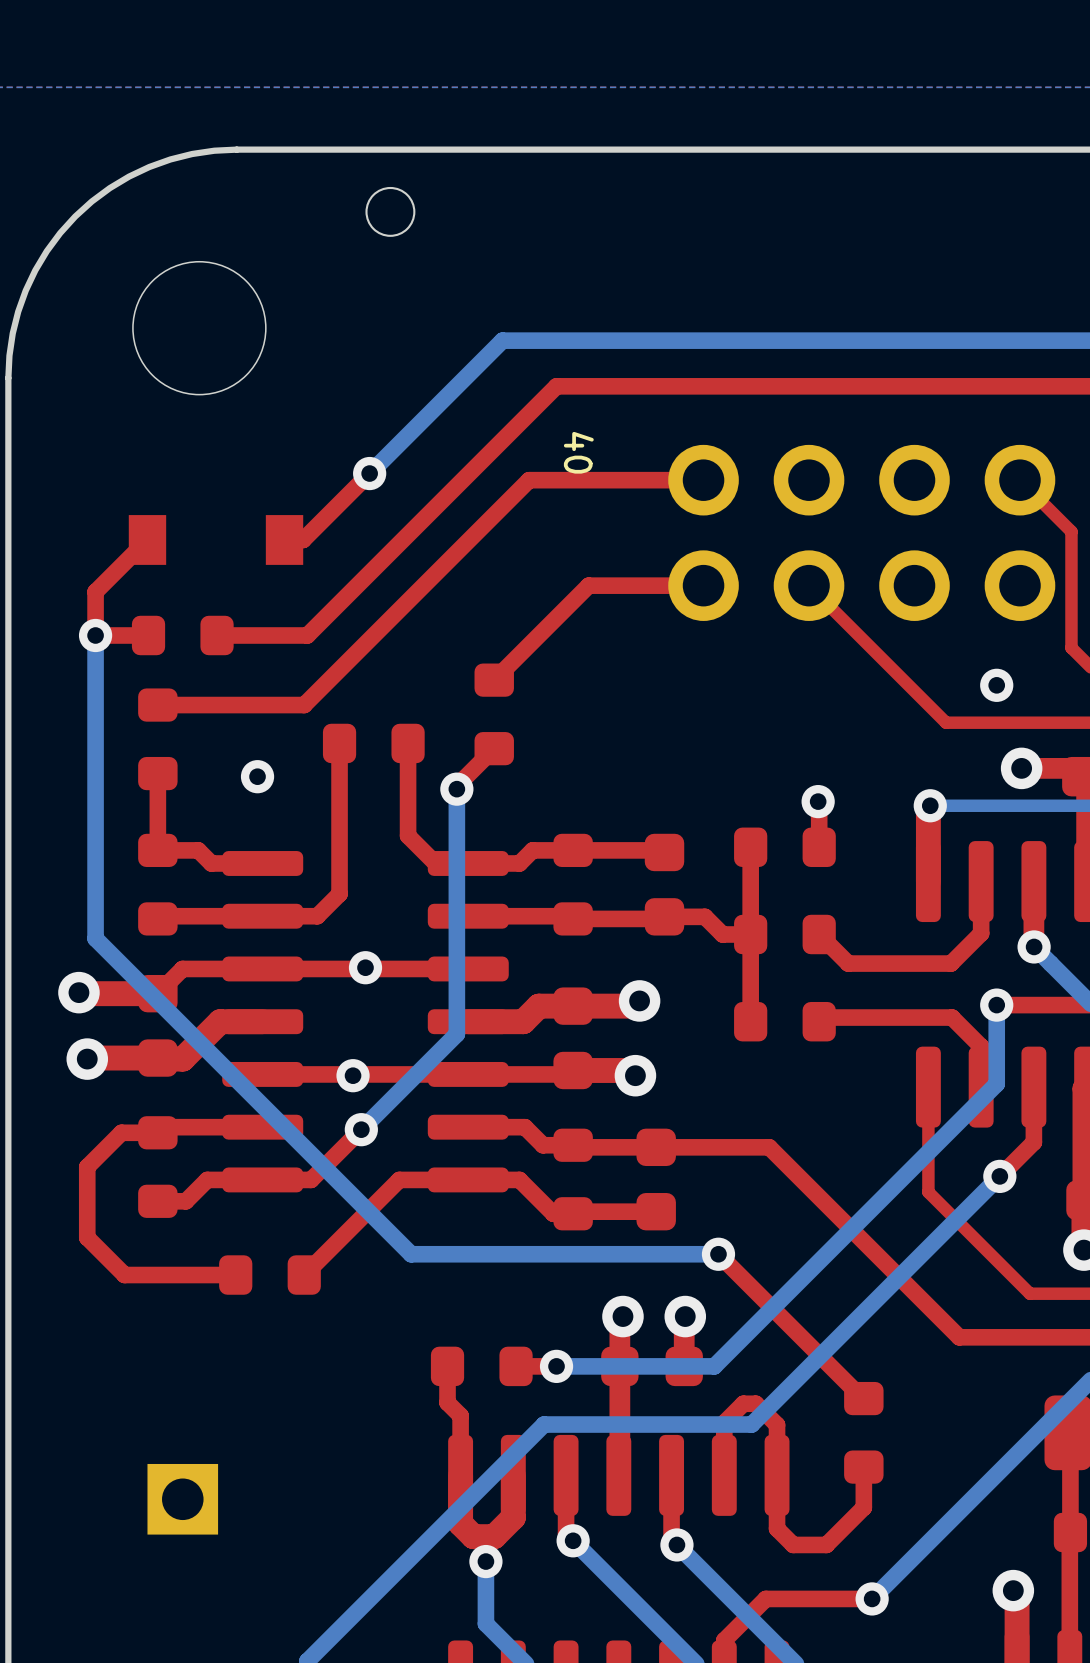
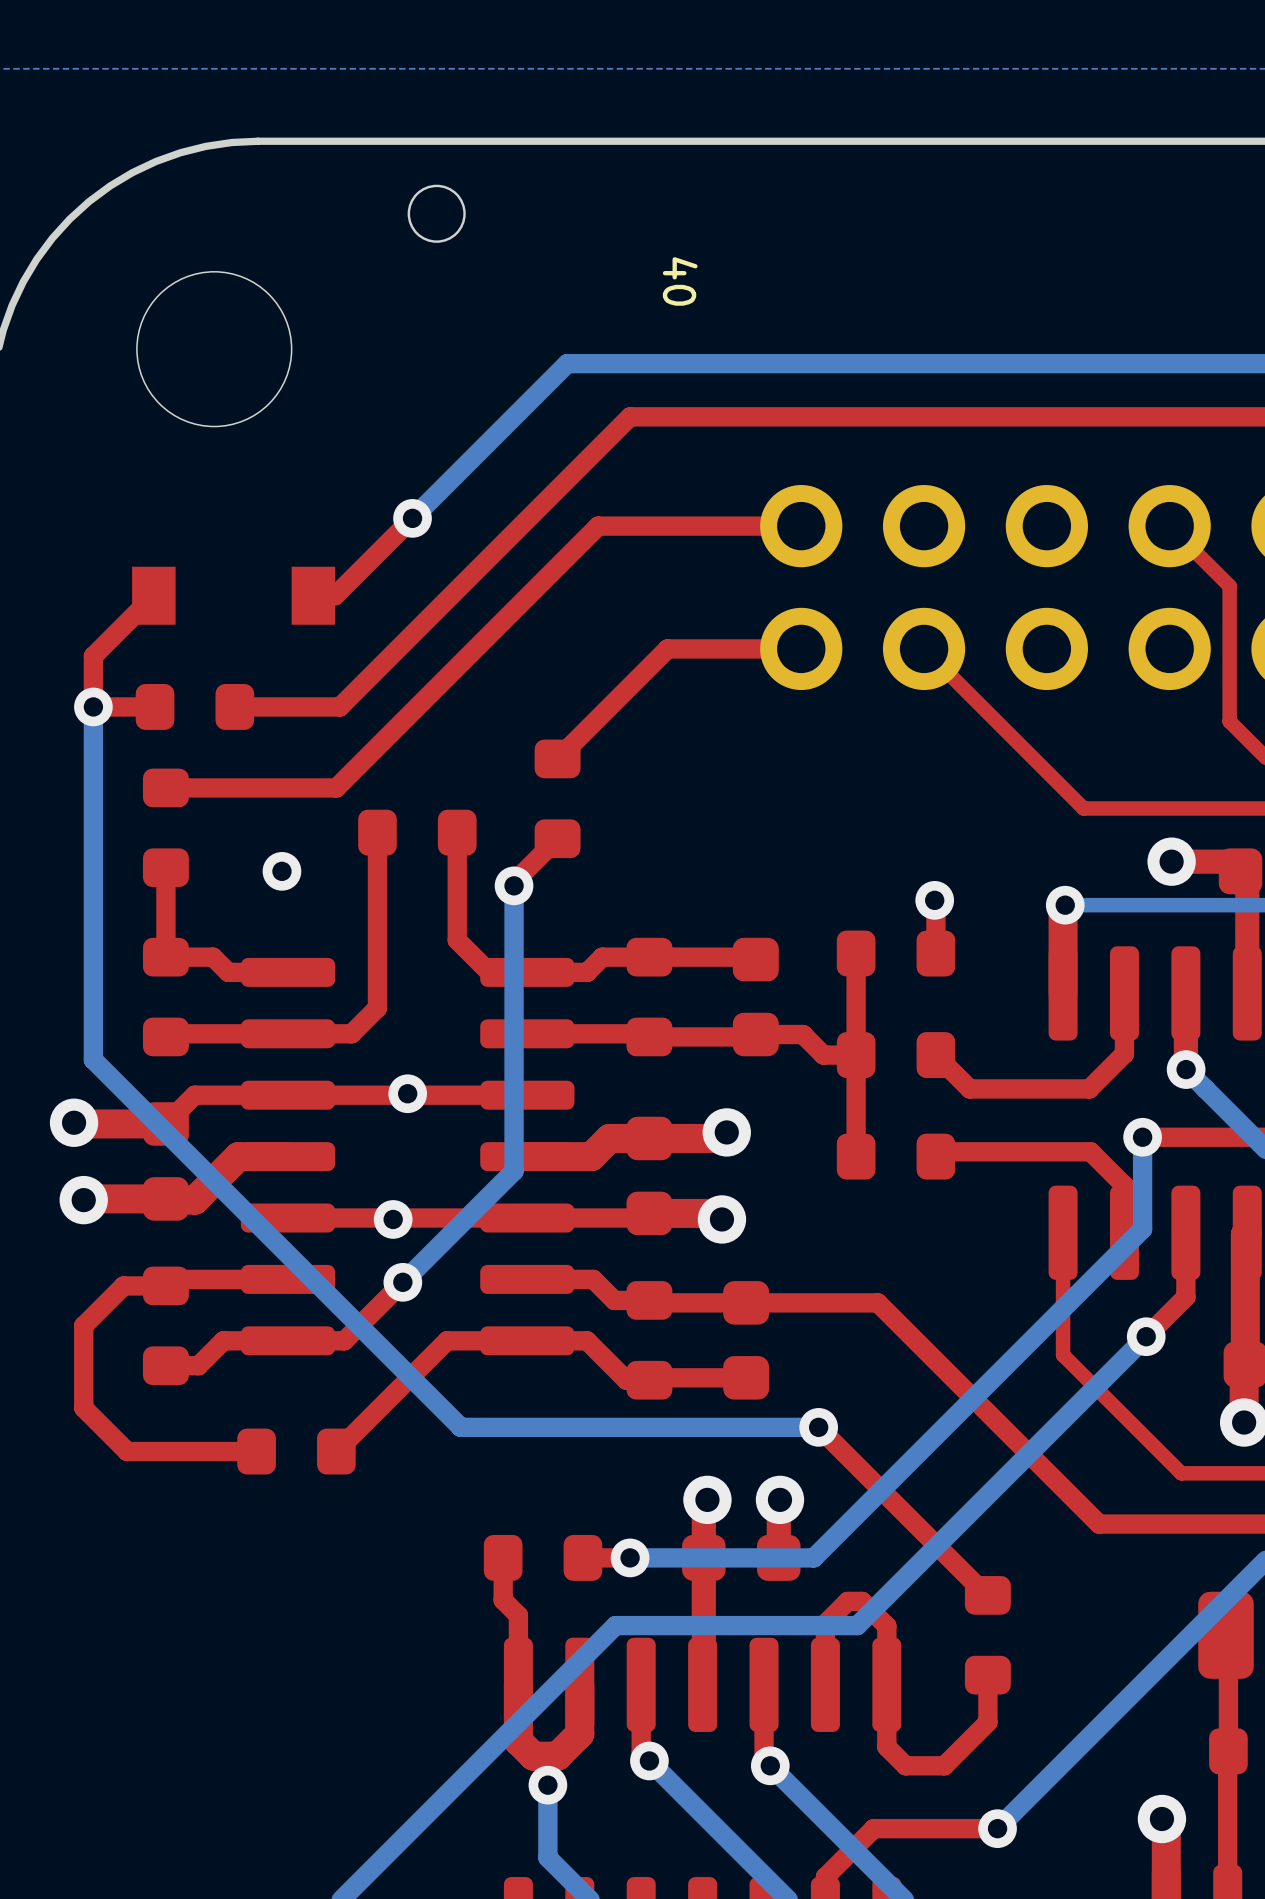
text position: 40 (578, 452) -> 40 (680, 281)
via: (996, 685) -> none
part: (182, 1499) -> none

